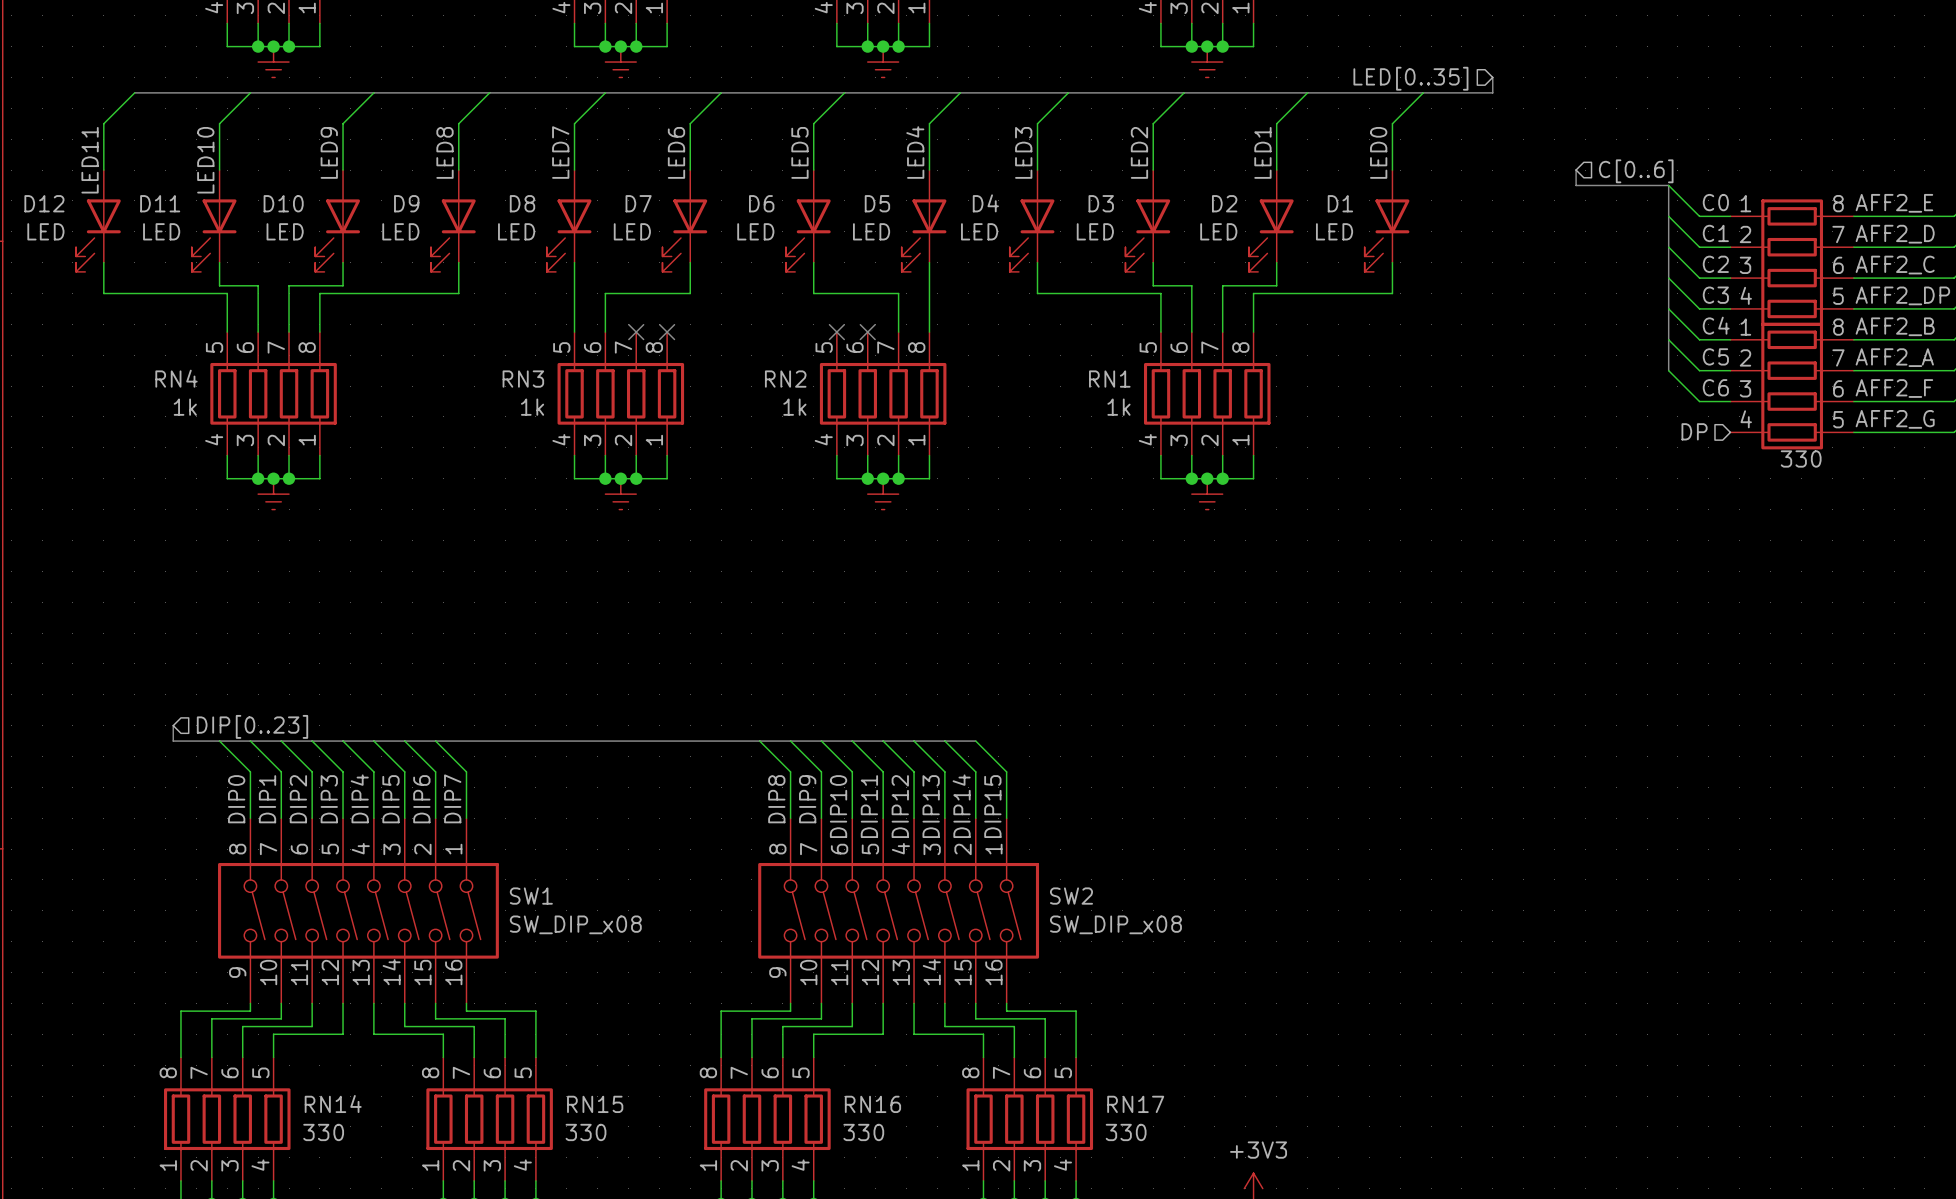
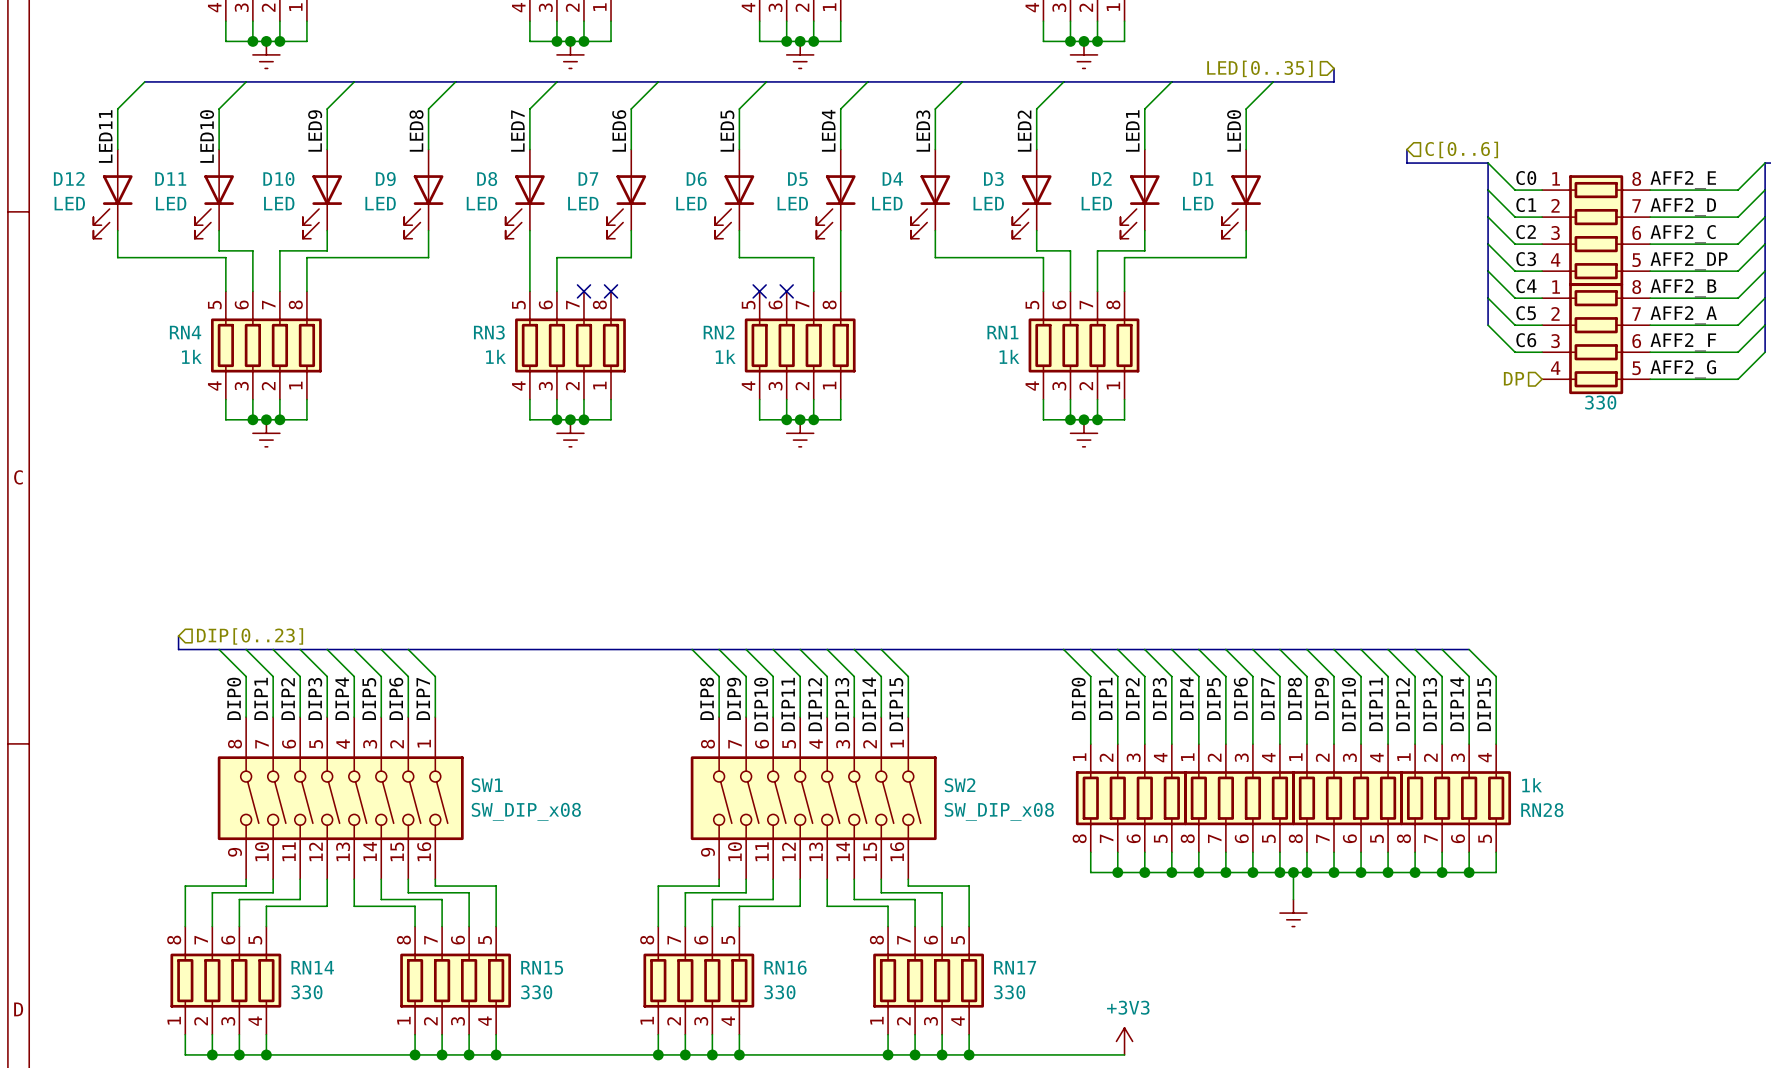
bus: none -> (881, 649) (1469, 649)
wire: none -> (1063, 649) (1090, 676) (1090, 744)
wire: none -> (1090, 649) (1117, 676) (1117, 744)
wire: none -> (1117, 649) (1144, 676) (1144, 744)
wire: none -> (1144, 649) (1171, 676) (1171, 744)
wire: none -> (1171, 649) (1198, 676) (1198, 744)
wire: none -> (1198, 649) (1225, 676) (1225, 744)
wire: none -> (1225, 649) (1252, 676) (1252, 744)
wire: none -> (1252, 649) (1279, 676) (1279, 744)
wire: none -> (1279, 649) (1306, 676) (1306, 744)
wire: none -> (1306, 649) (1334, 676) (1334, 744)
wire: none -> (1334, 649) (1361, 676) (1361, 744)
wire: none -> (1361, 649) (1388, 676) (1388, 744)
wire: none -> (1388, 649) (1415, 676) (1415, 744)
wire: none -> (1415, 649) (1442, 676) (1442, 744)
wire: none -> (1442, 649) (1469, 676) (1469, 744)
wire: none -> (1469, 649) (1496, 676) (1496, 744)
label: none -> DIP4 (1186, 698)
label: none -> DIP7 (1267, 698)
label: none -> DIP0 (1078, 698)
label: none -> DIP1 (1105, 698)
label: none -> DIP2 (1132, 699)
label: none -> DIP3 (1159, 698)
label: none -> DIP5 (1213, 699)
label: none -> DIP6 (1240, 698)
label: none -> DIP8 (1294, 698)
label: none -> DIP9 (1321, 698)
label: none -> DIP10 (1348, 704)
label: none -> DIP11 (1376, 704)
label: none -> DIP12 (1402, 704)
label: none -> DIP13 (1430, 704)
label: none -> DIP14 (1457, 704)
label: none -> DIP15 (1484, 704)
part: none -> (1131, 798)
part: none -> (1239, 798)
part: none -> (1347, 798)
RN28: none -> 1k (1455, 798)
wire: none -> (1090, 852) (1090, 872) (1496, 872) (1496, 852)
wire: none -> (1117, 852) (1117, 872)
wire: none -> (1144, 852) (1144, 872)
wire: none -> (1171, 852) (1171, 872)
wire: none -> (1198, 852) (1198, 872)
wire: none -> (1225, 852) (1225, 872)
wire: none -> (1252, 852) (1252, 872)
wire: none -> (1279, 852) (1279, 872)
wire: none -> (1306, 852) (1306, 872)
wire: none -> (1334, 852) (1334, 872)
wire: none -> (1361, 852) (1361, 872)
wire: none -> (1388, 852) (1388, 872)
wire: none -> (1415, 852) (1415, 872)
wire: none -> (1442, 852) (1442, 872)
wire: none -> (1469, 852) (1469, 872)
junction: none -> (1117, 872)
junction: none -> (1144, 872)
junction: none -> (1171, 872)
junction: none -> (1198, 872)
junction: none -> (1225, 872)
junction: none -> (1252, 872)
junction: none -> (1279, 872)
wire: none -> (1293, 872) (1293, 899)
junction: none -> (1293, 872)
junction: none -> (1306, 872)
junction: none -> (1334, 872)
junction: none -> (1361, 872)
junction: none -> (1388, 872)
junction: none -> (1415, 872)
junction: none -> (1442, 872)
junction: none -> (1469, 872)
power symbol: none -> (1293, 913)

